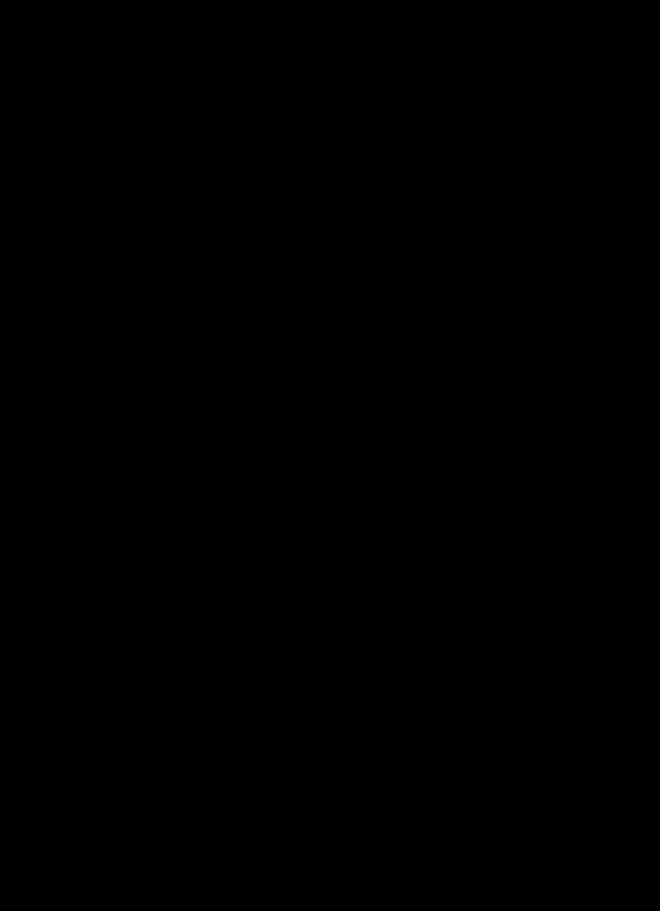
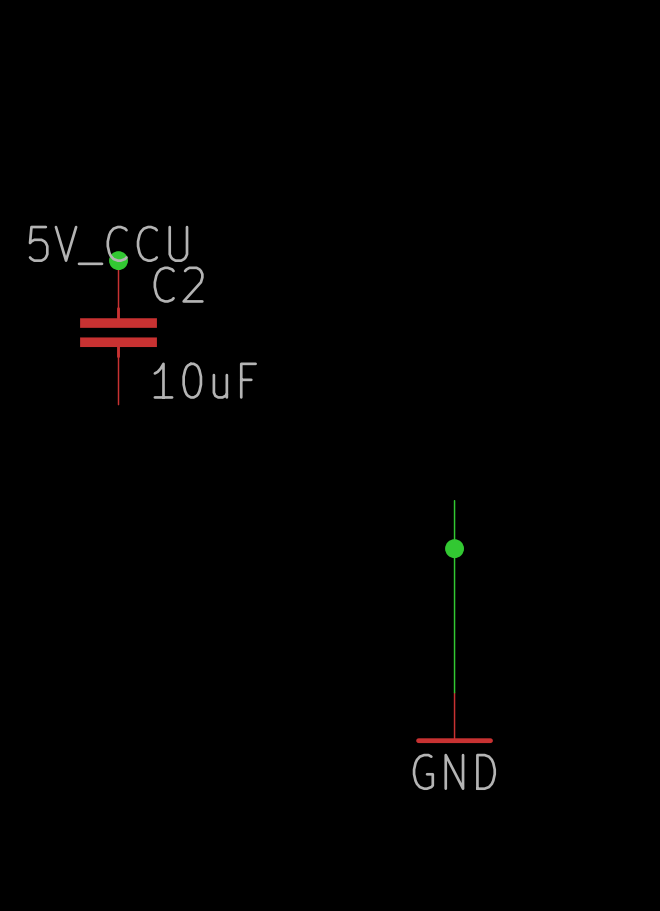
label: none -> 5V_CCU (108, 245)
junction: none -> (118, 260)
C2: none -> 10uF (118, 332)
wire: none -> (454, 500) (454, 692)
junction: none -> (454, 548)
power symbol: none -> GND (454, 717)

